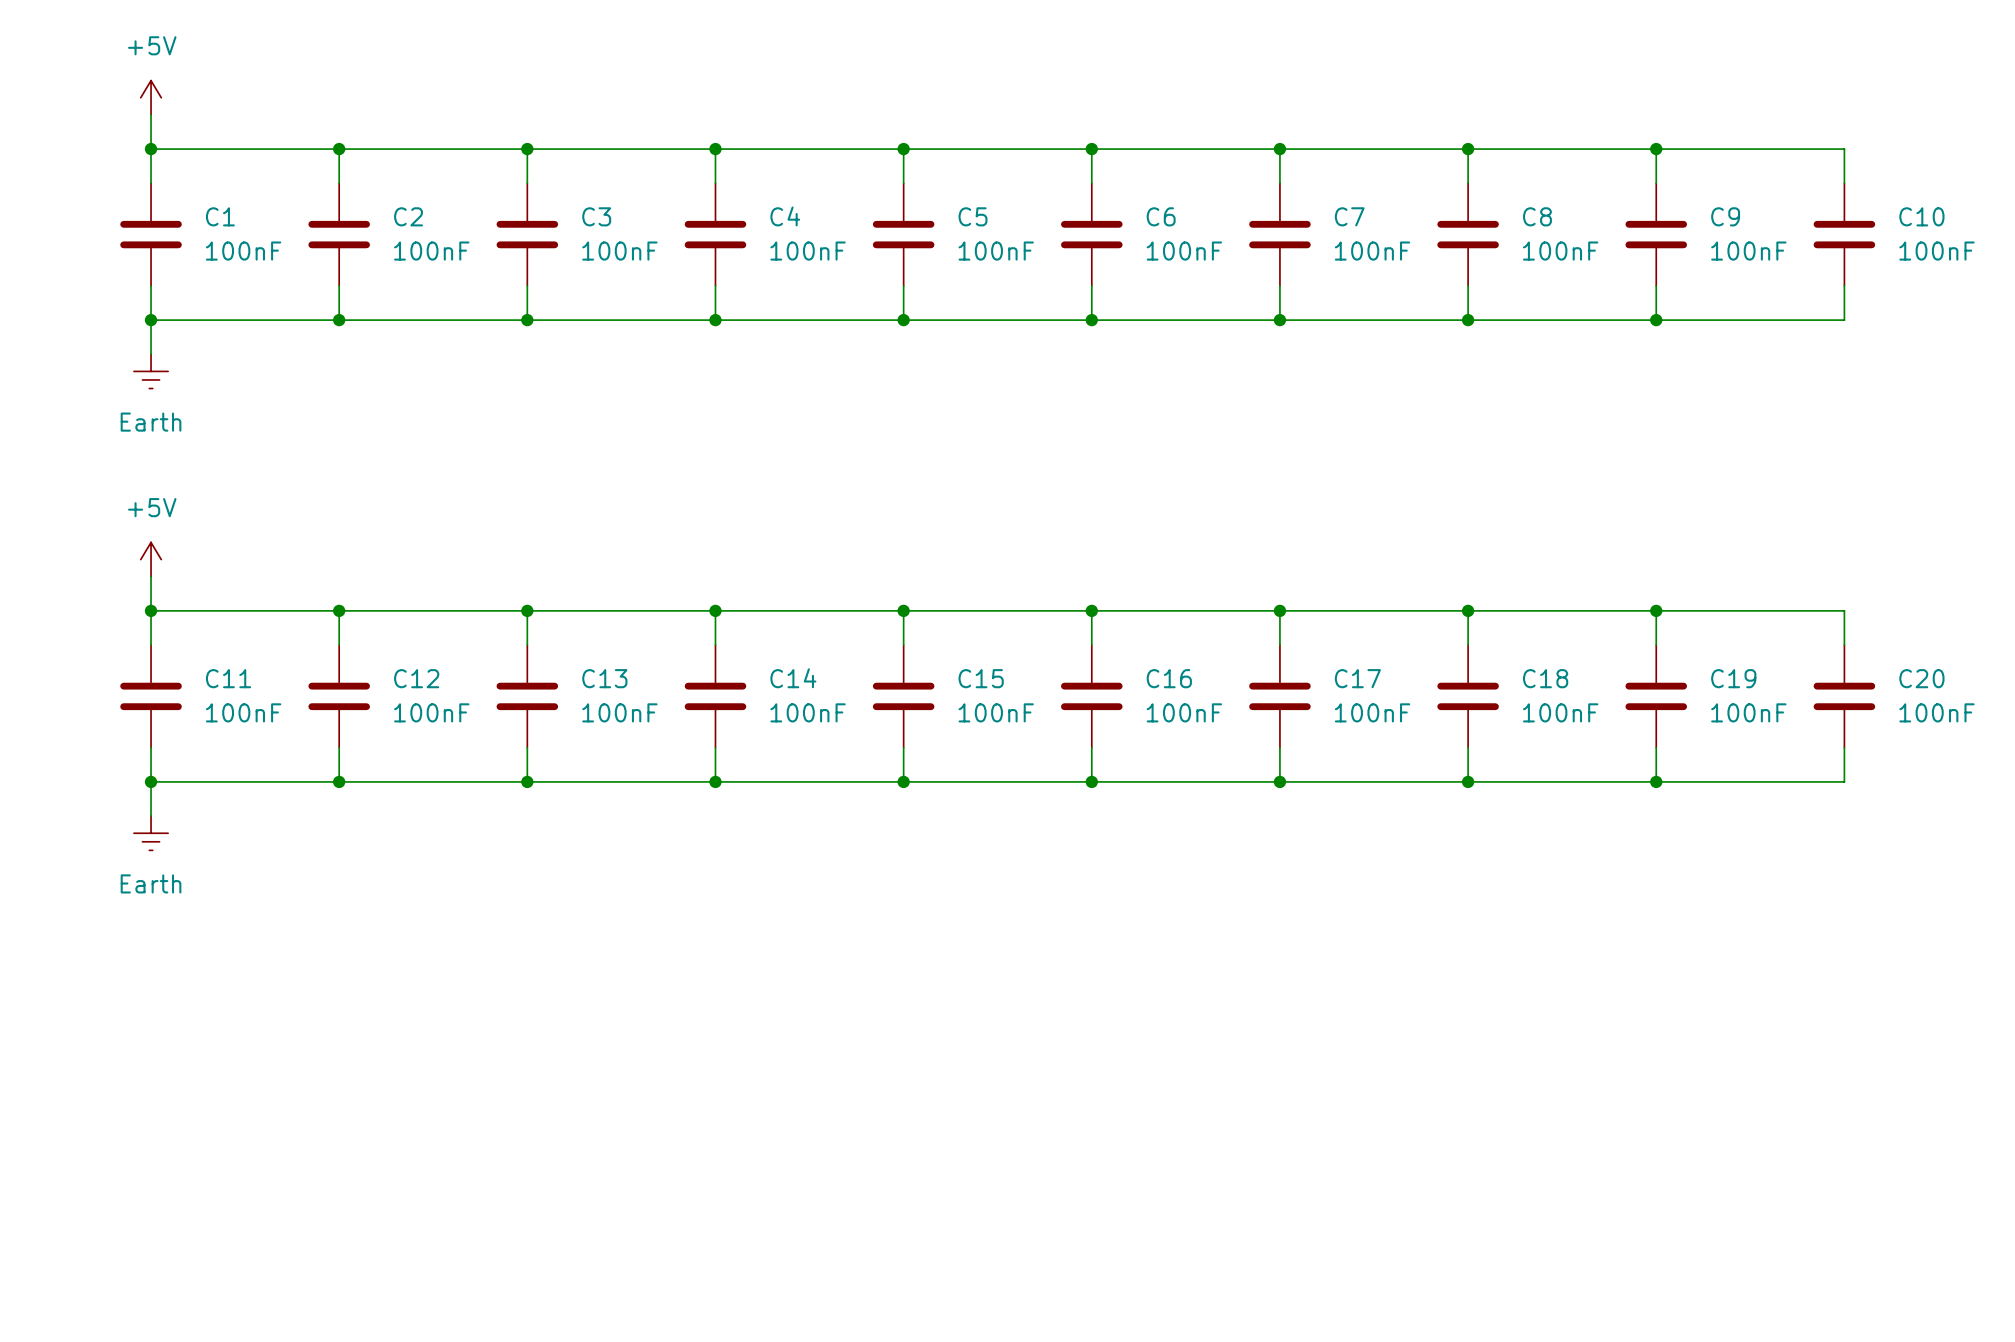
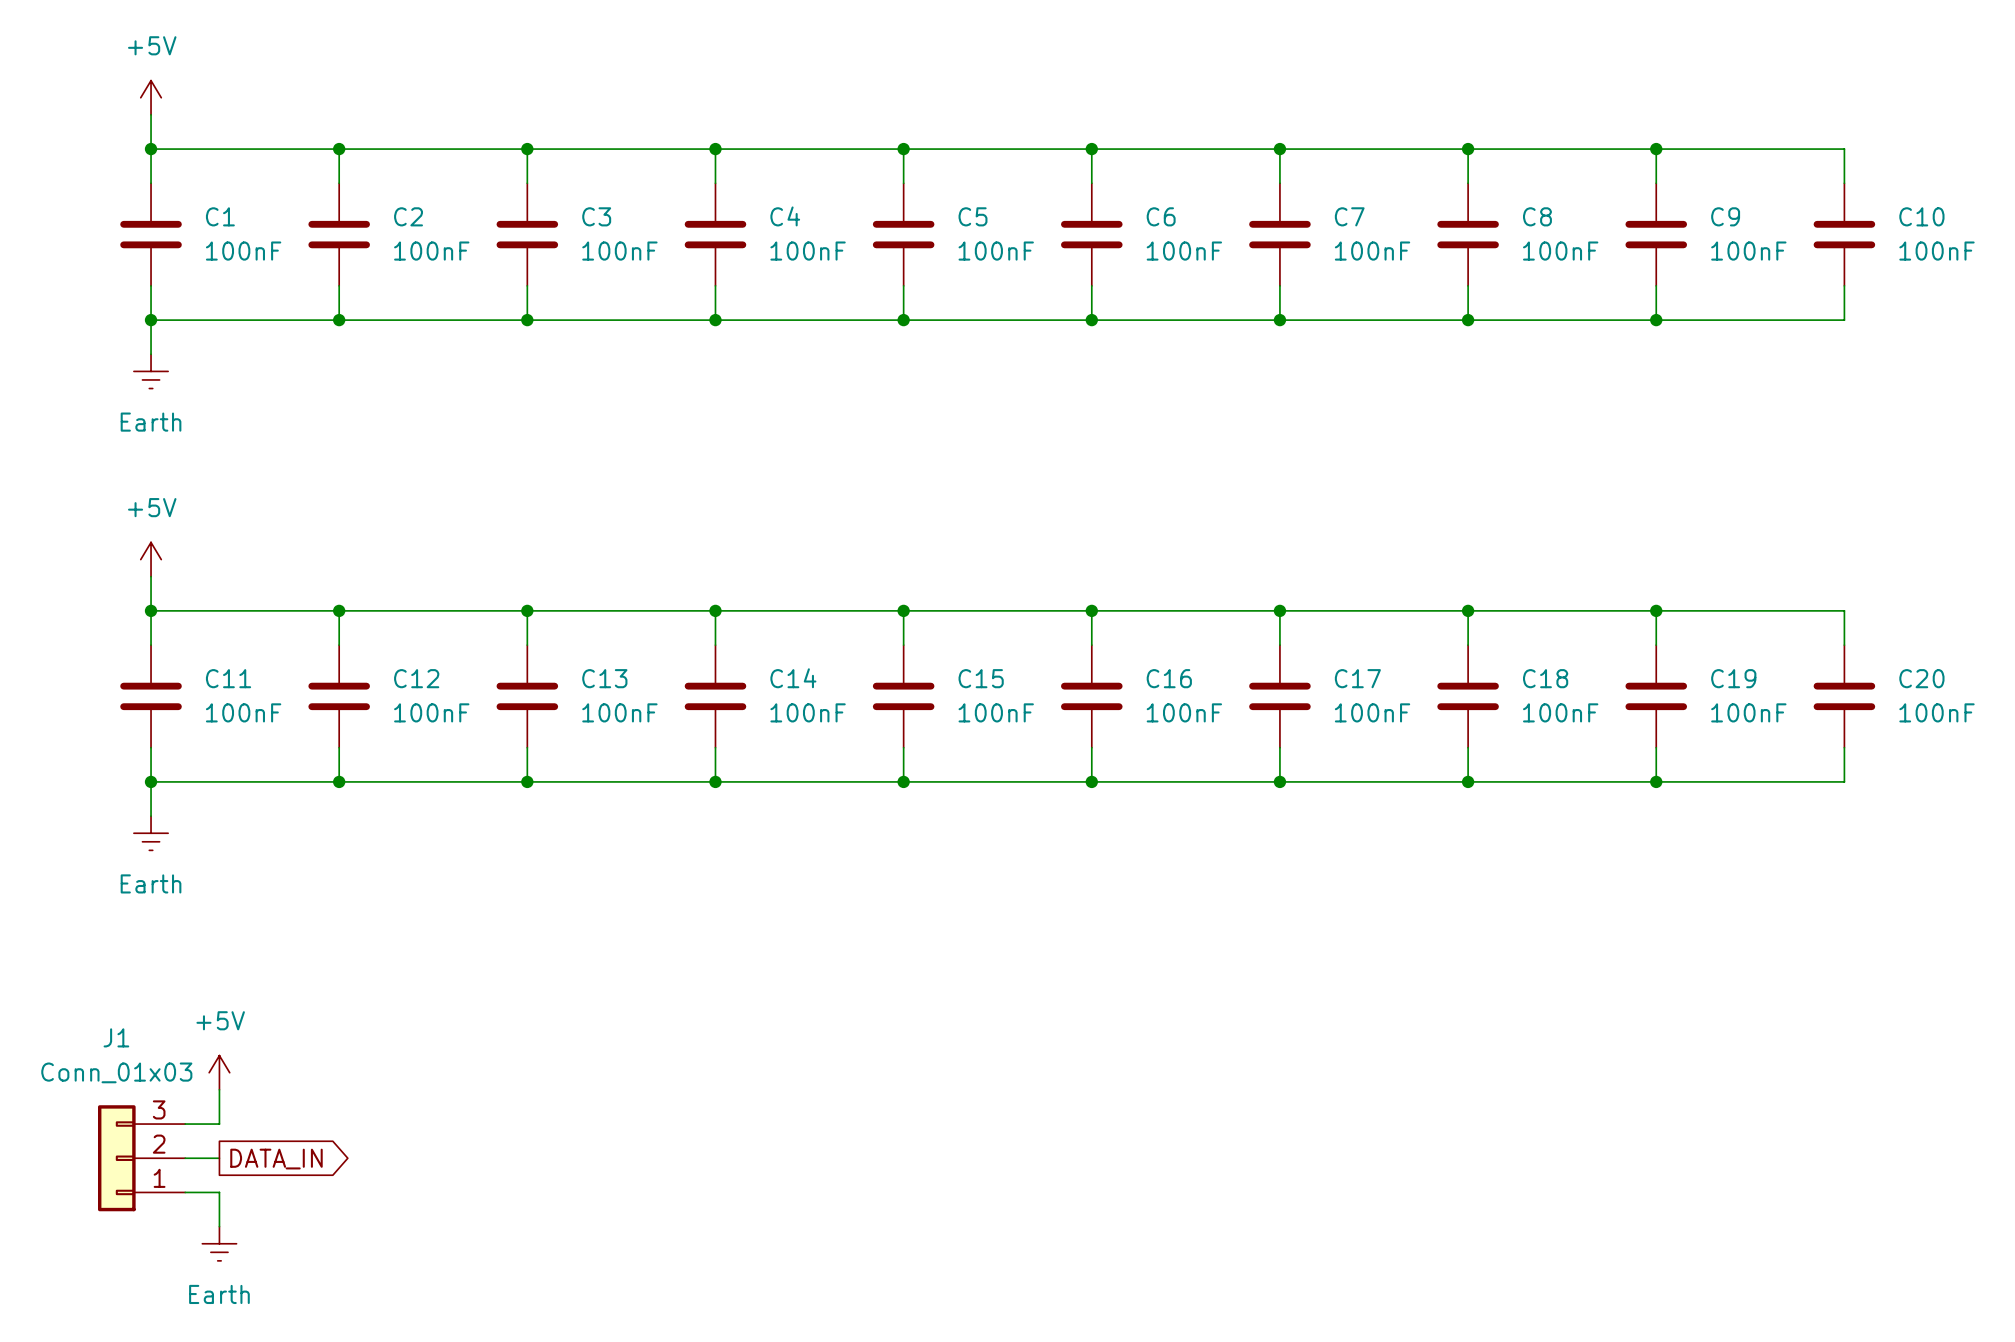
power symbol: none -> +5V (219, 1072)
wire: none -> (219, 1089) (219, 1124) (185, 1124)
J1: none -> Conn_01x03 (141, 1158)
wire: none -> (185, 1158) (219, 1158)
global label: none -> DATA_IN (276, 1159)
wire: none -> (185, 1192) (219, 1192) (219, 1226)
power symbol: none -> Earth (219, 1243)

